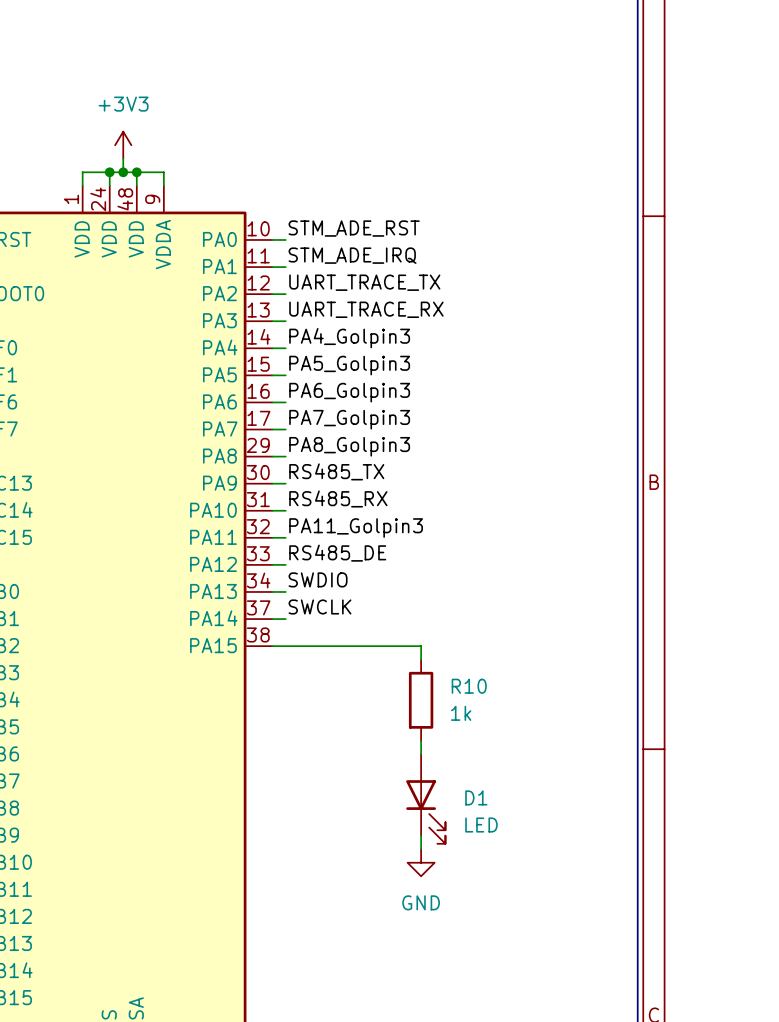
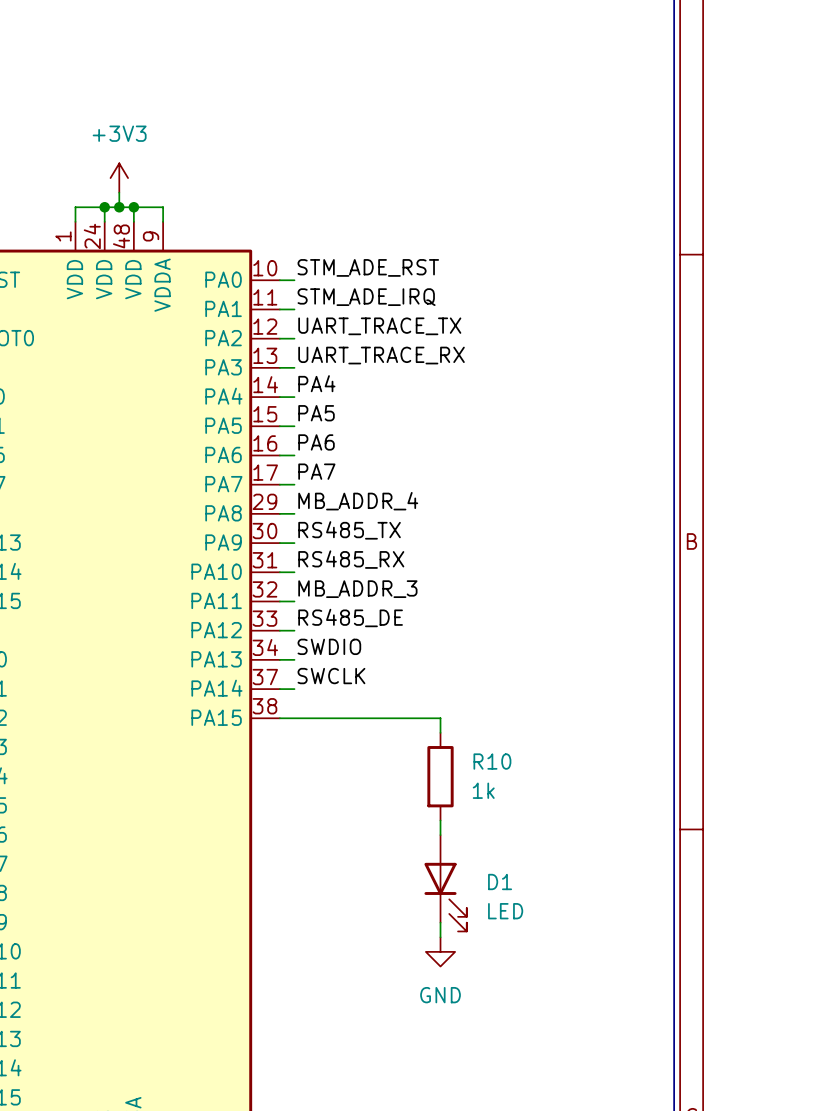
label: PA4_Golpin3 (349, 338) -> PA4 (316, 383)
label: PA5_Golpin3 (349, 365) -> PA5 (316, 413)
label: PA6_Golpin3 (349, 392) -> PA6 (316, 442)
label: PA7_Golpin3 (349, 419) -> PA7 (316, 471)
label: PA8_Golpin3 (349, 446) -> MB_ADDR_4 (358, 501)
label: PA11_Golpin3 (356, 528) -> MB_ADDR_3 (357, 589)

